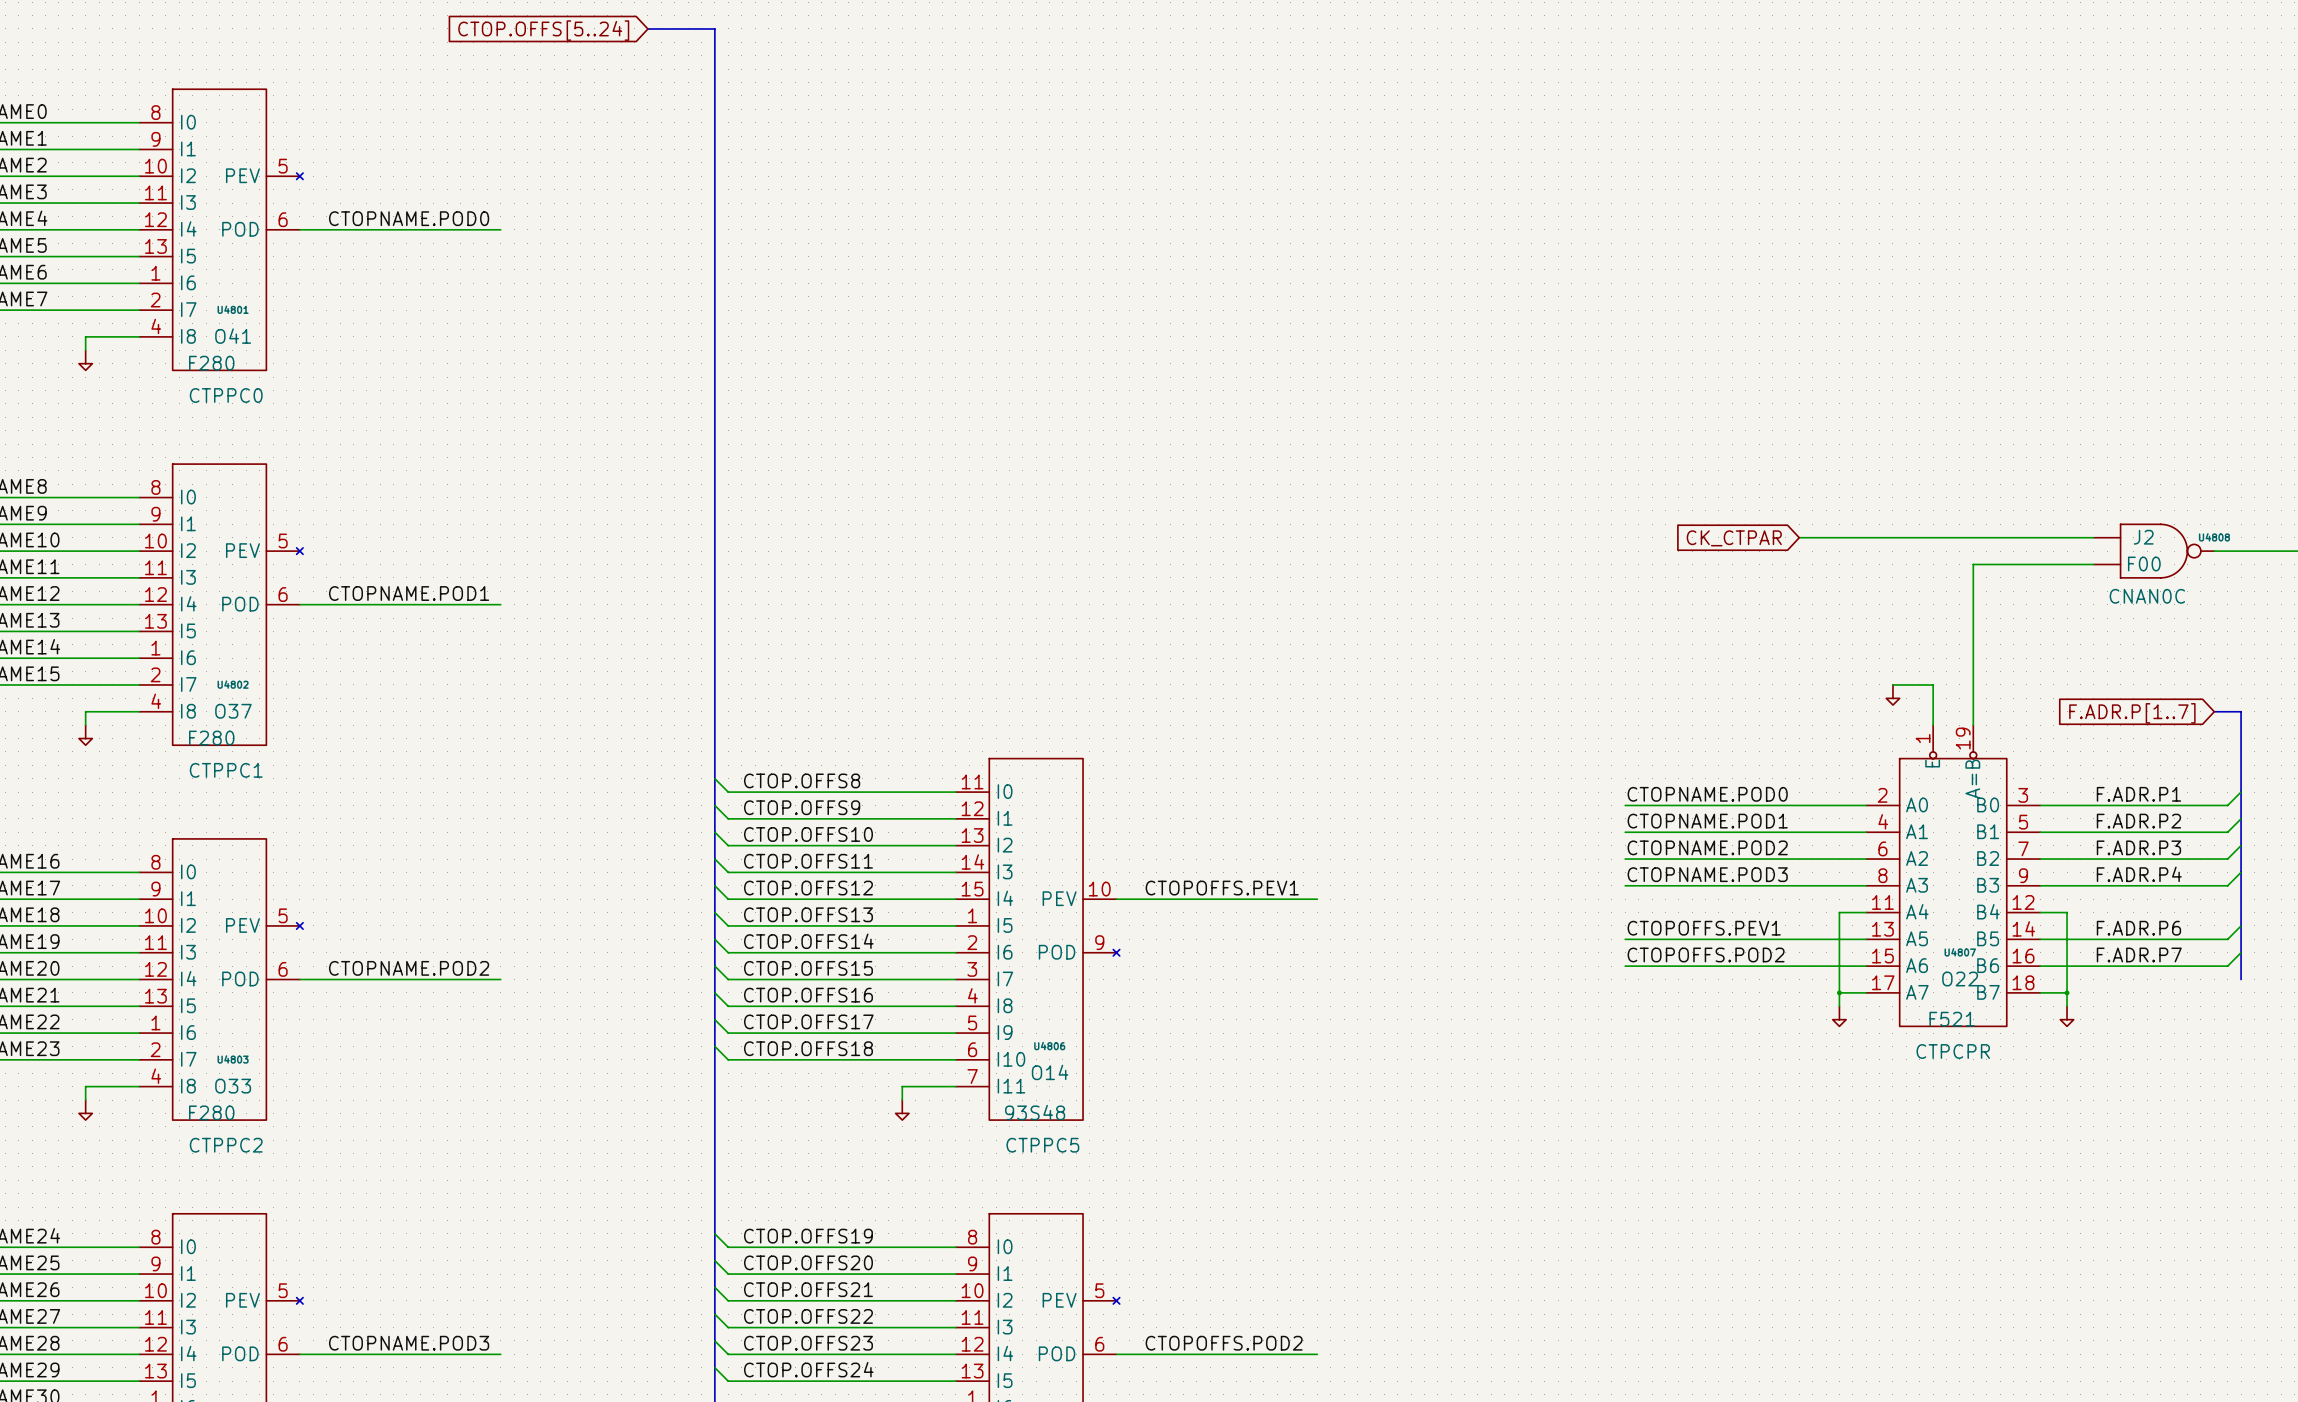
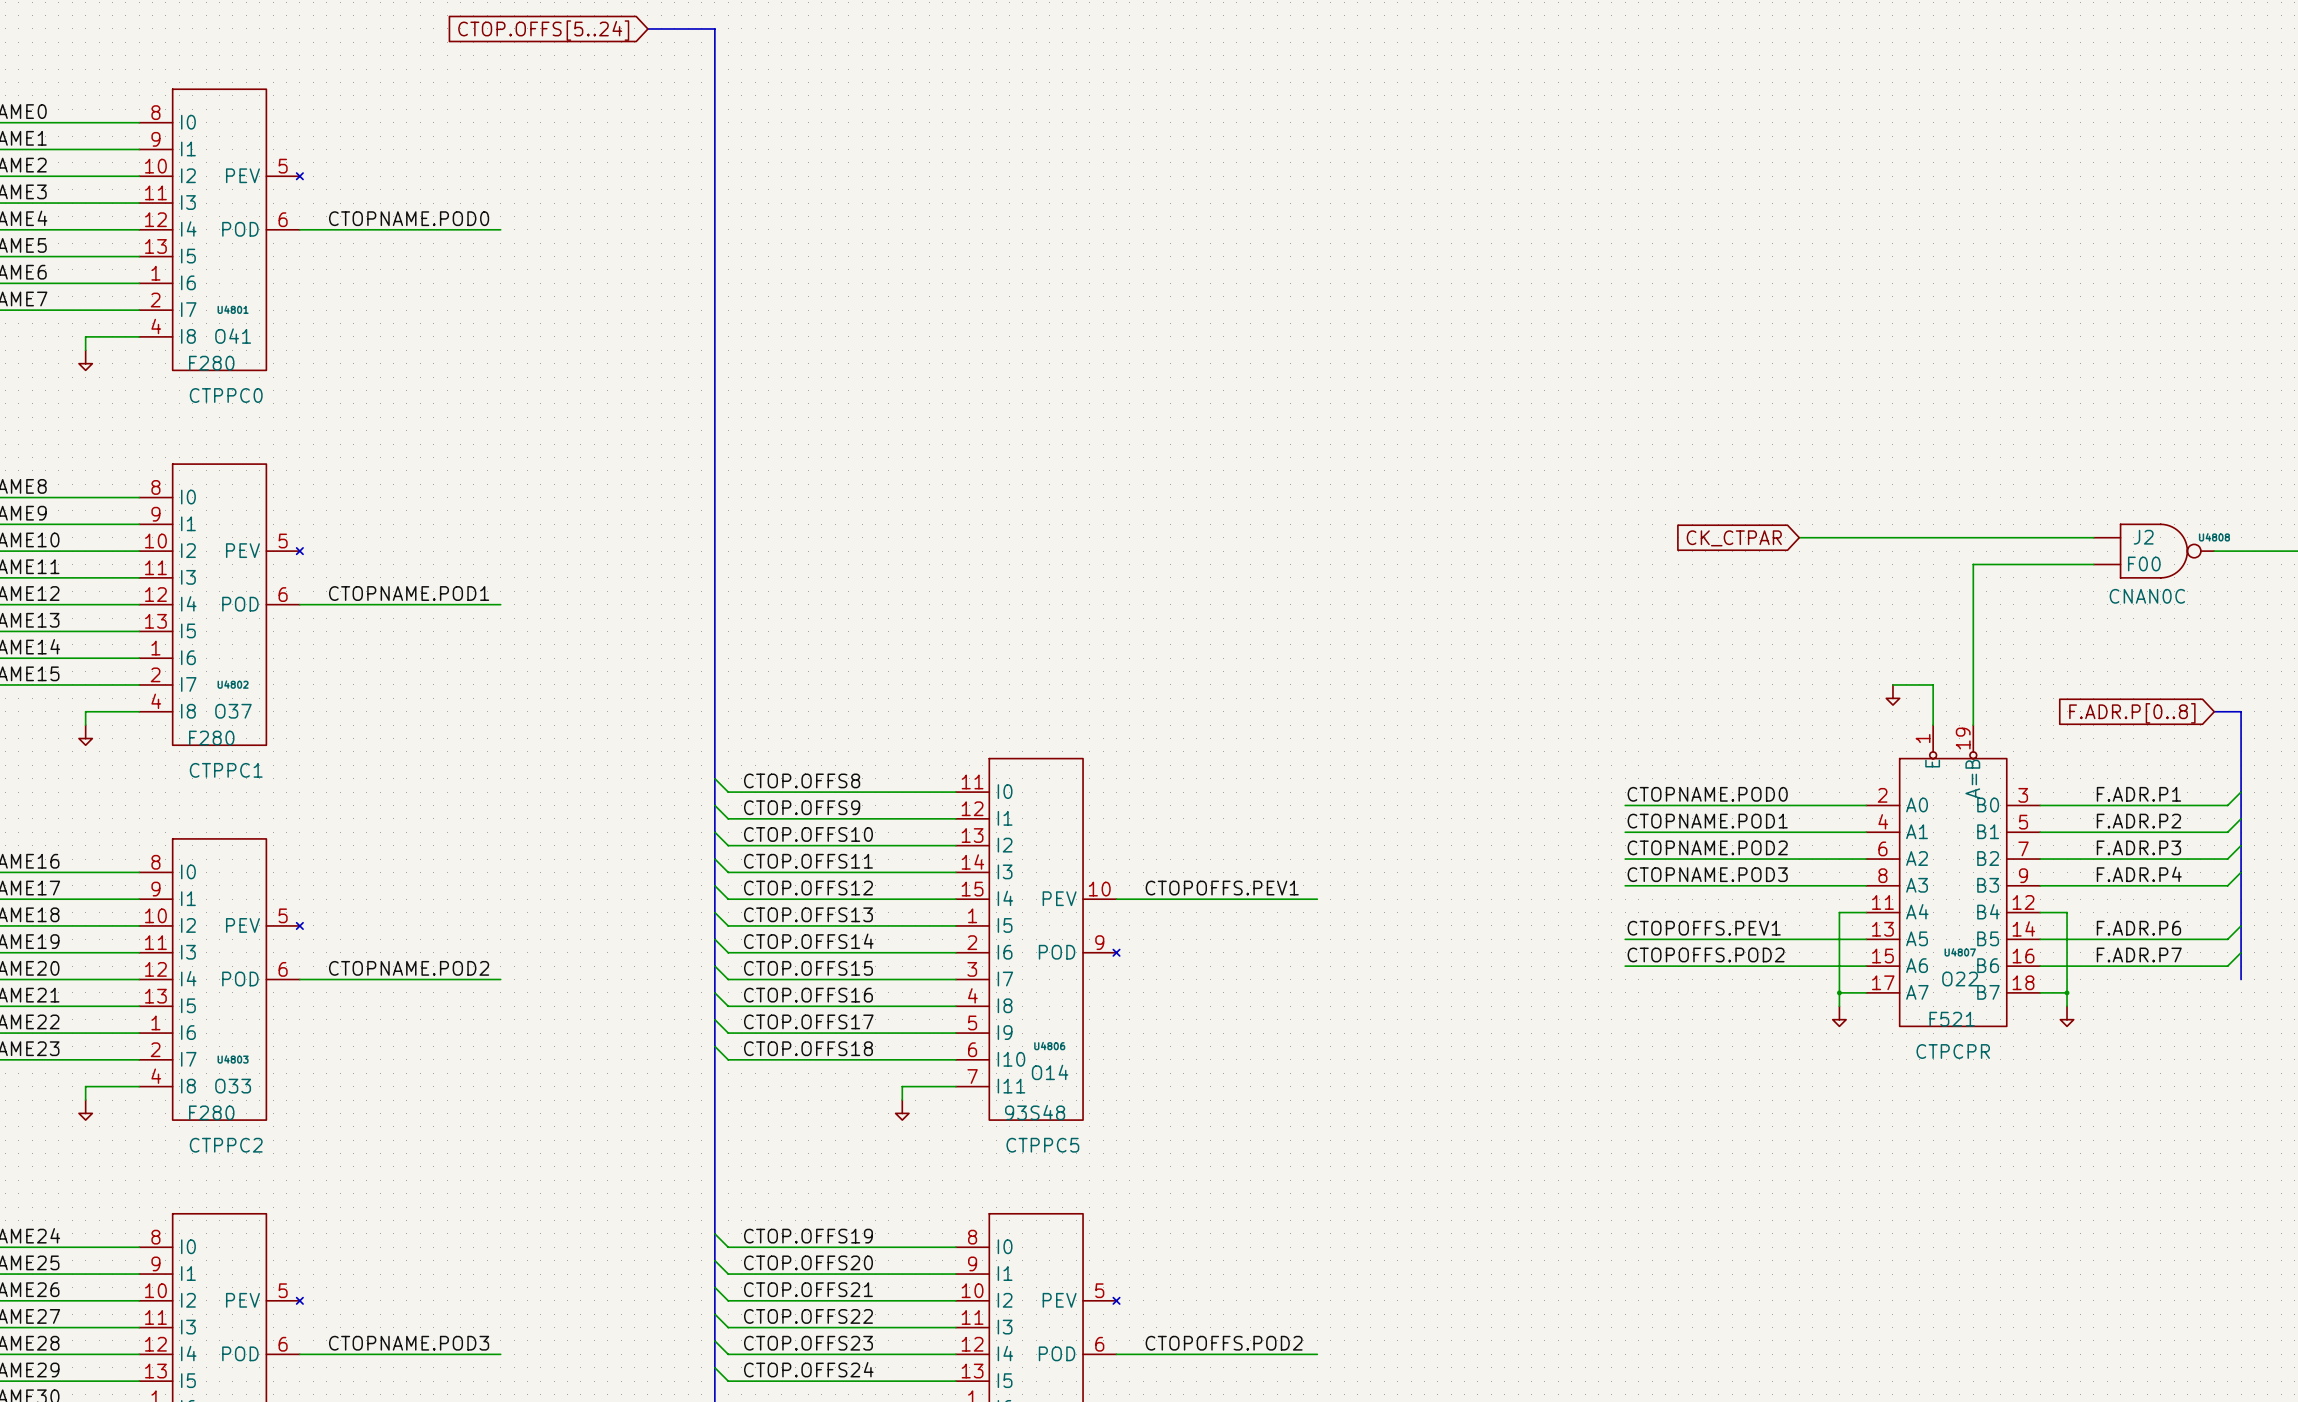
global label: F.ADR.P[1..7] (2132, 713) -> F.ADR.P[0..8] (2132, 713)

